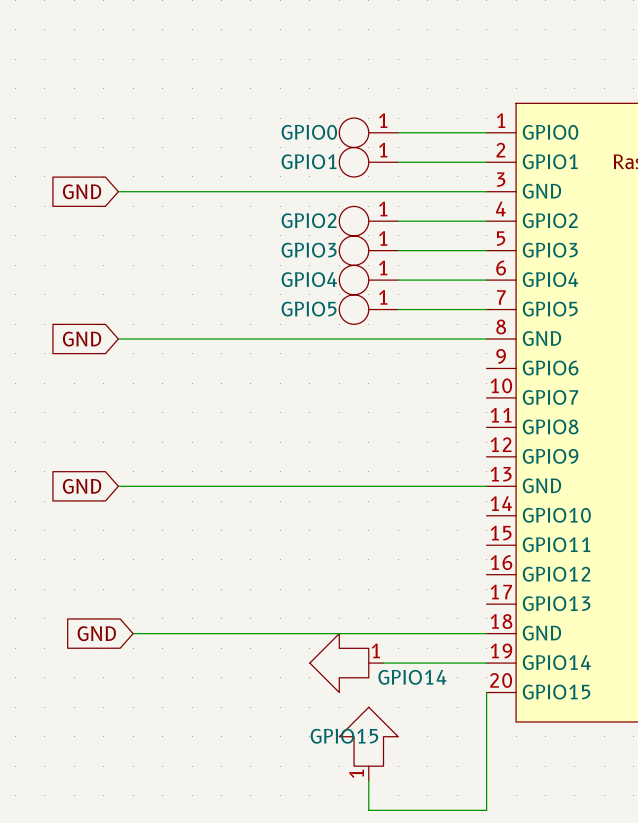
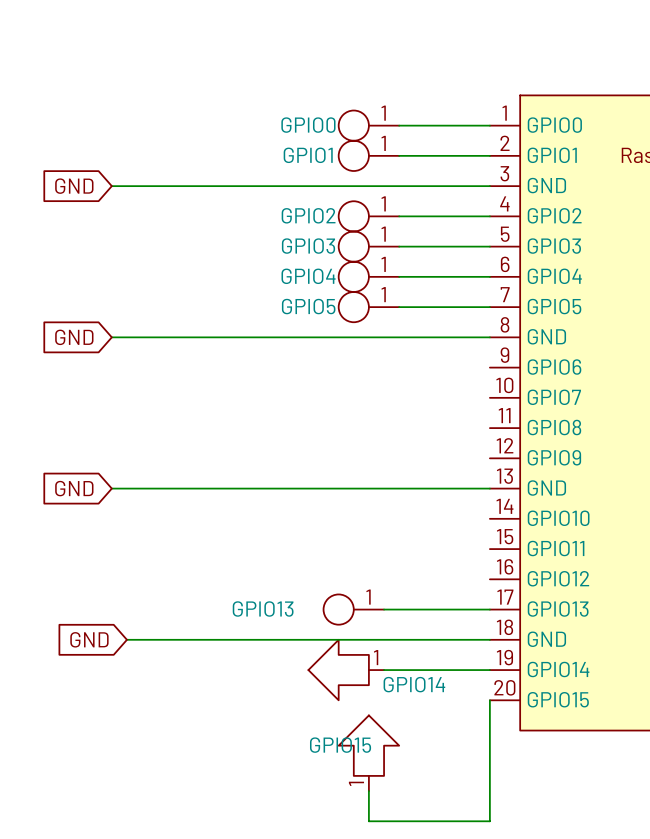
GPIO13: none -> (353, 609)
wire: none -> (384, 609) (489, 609)

